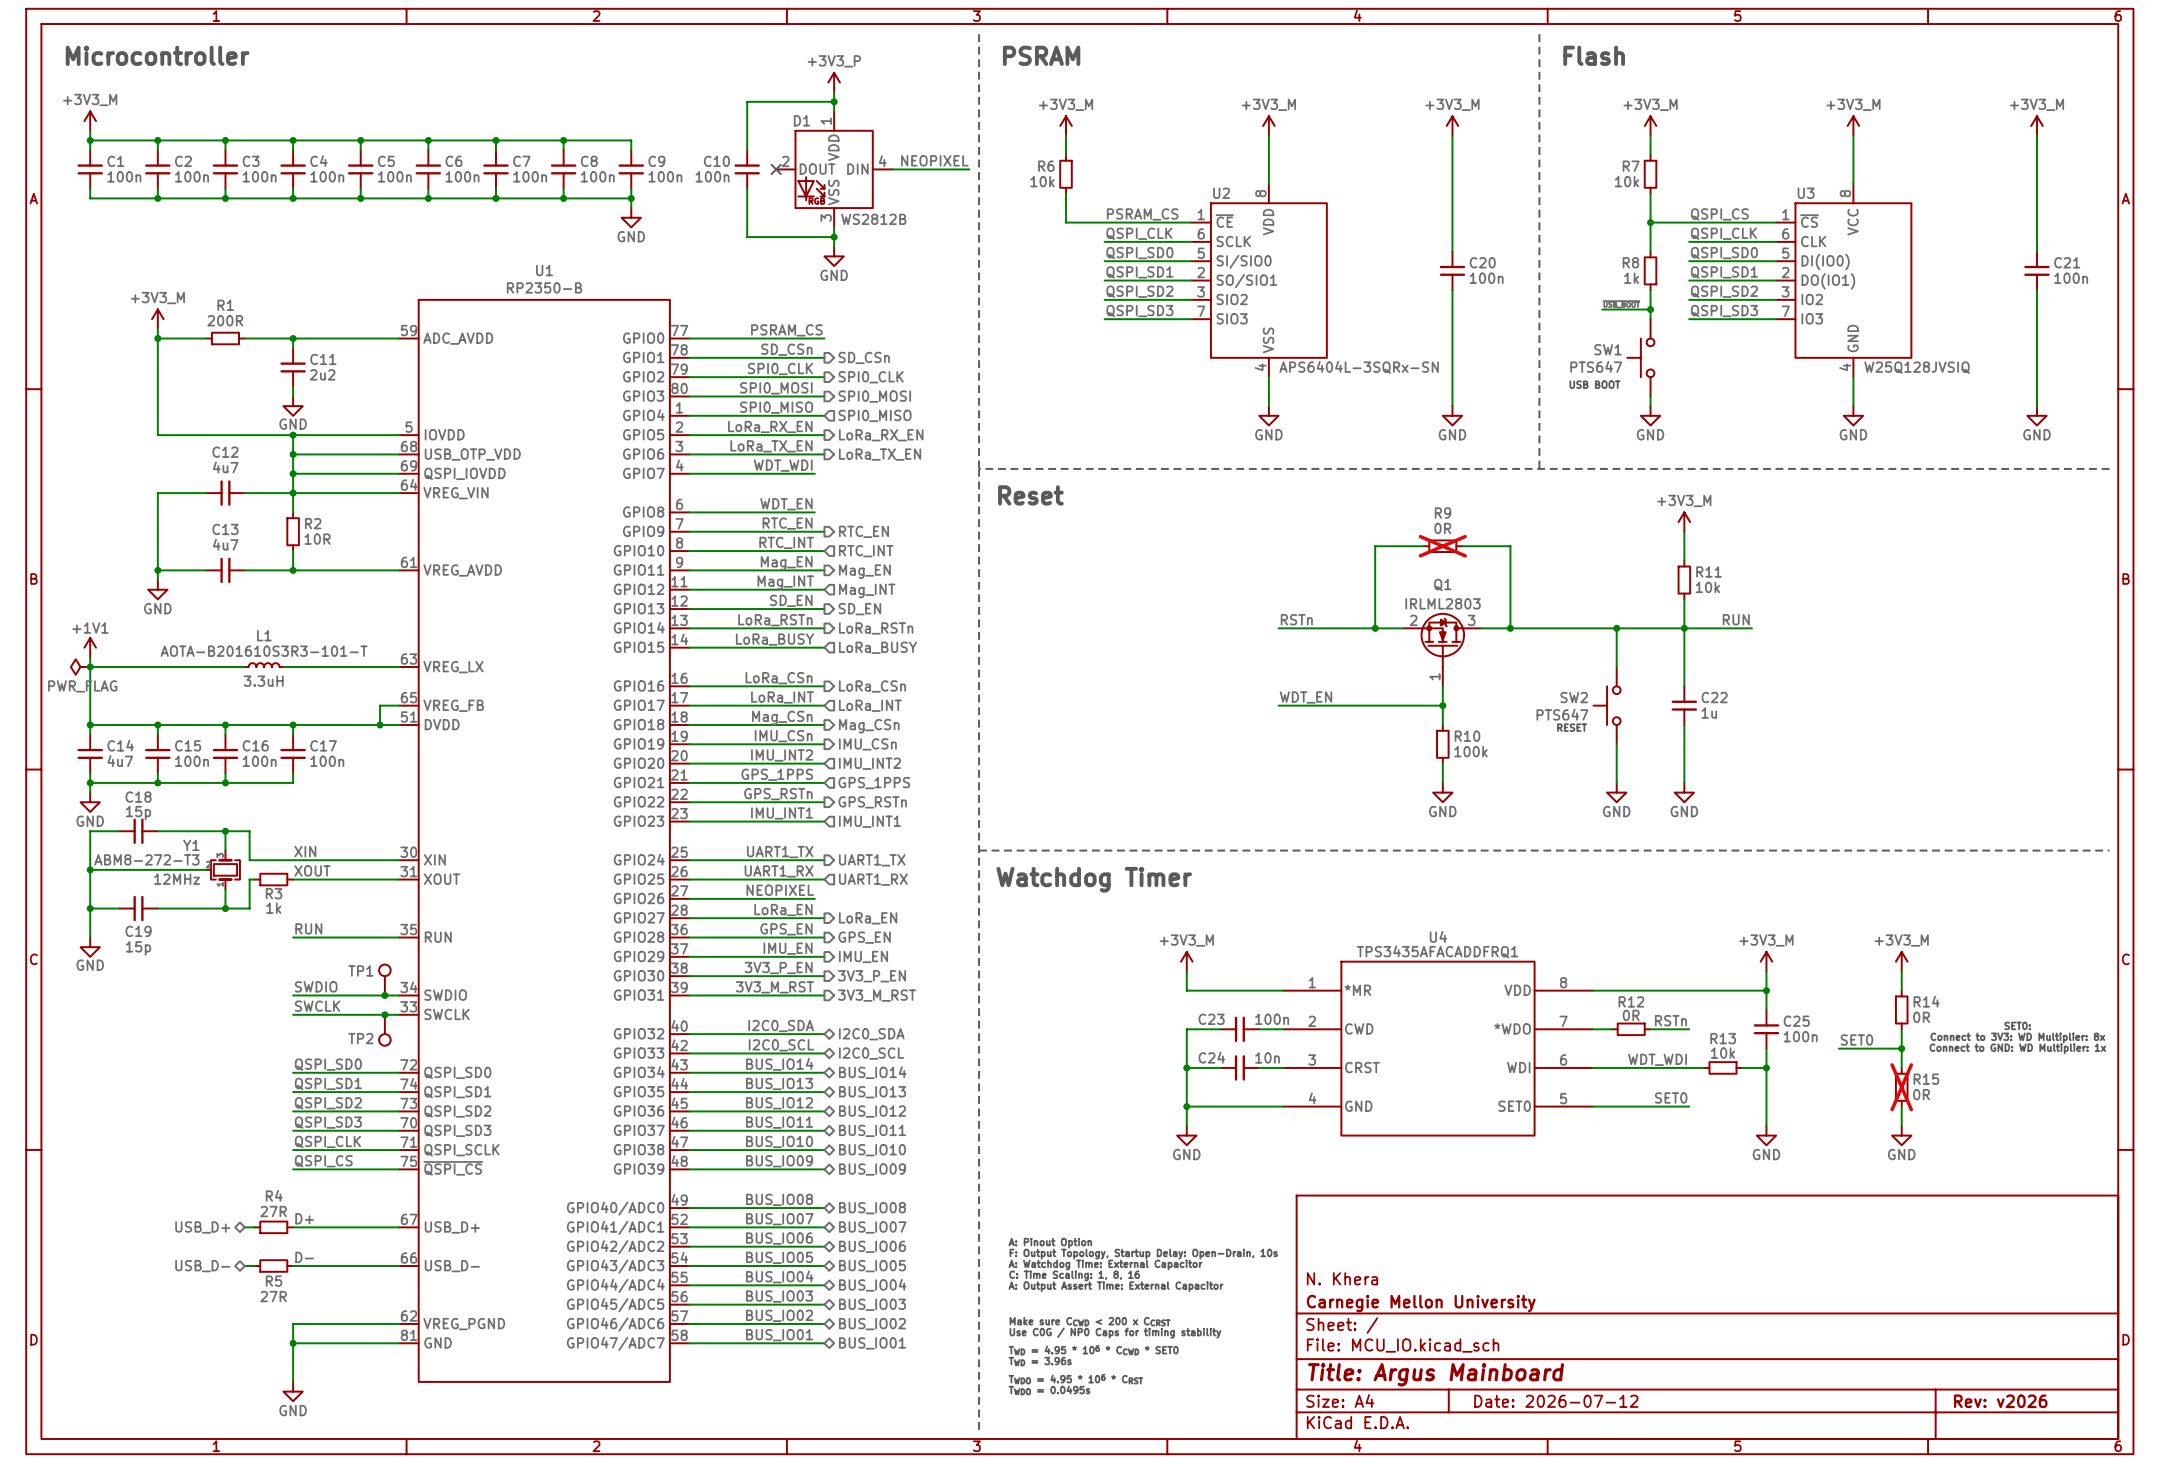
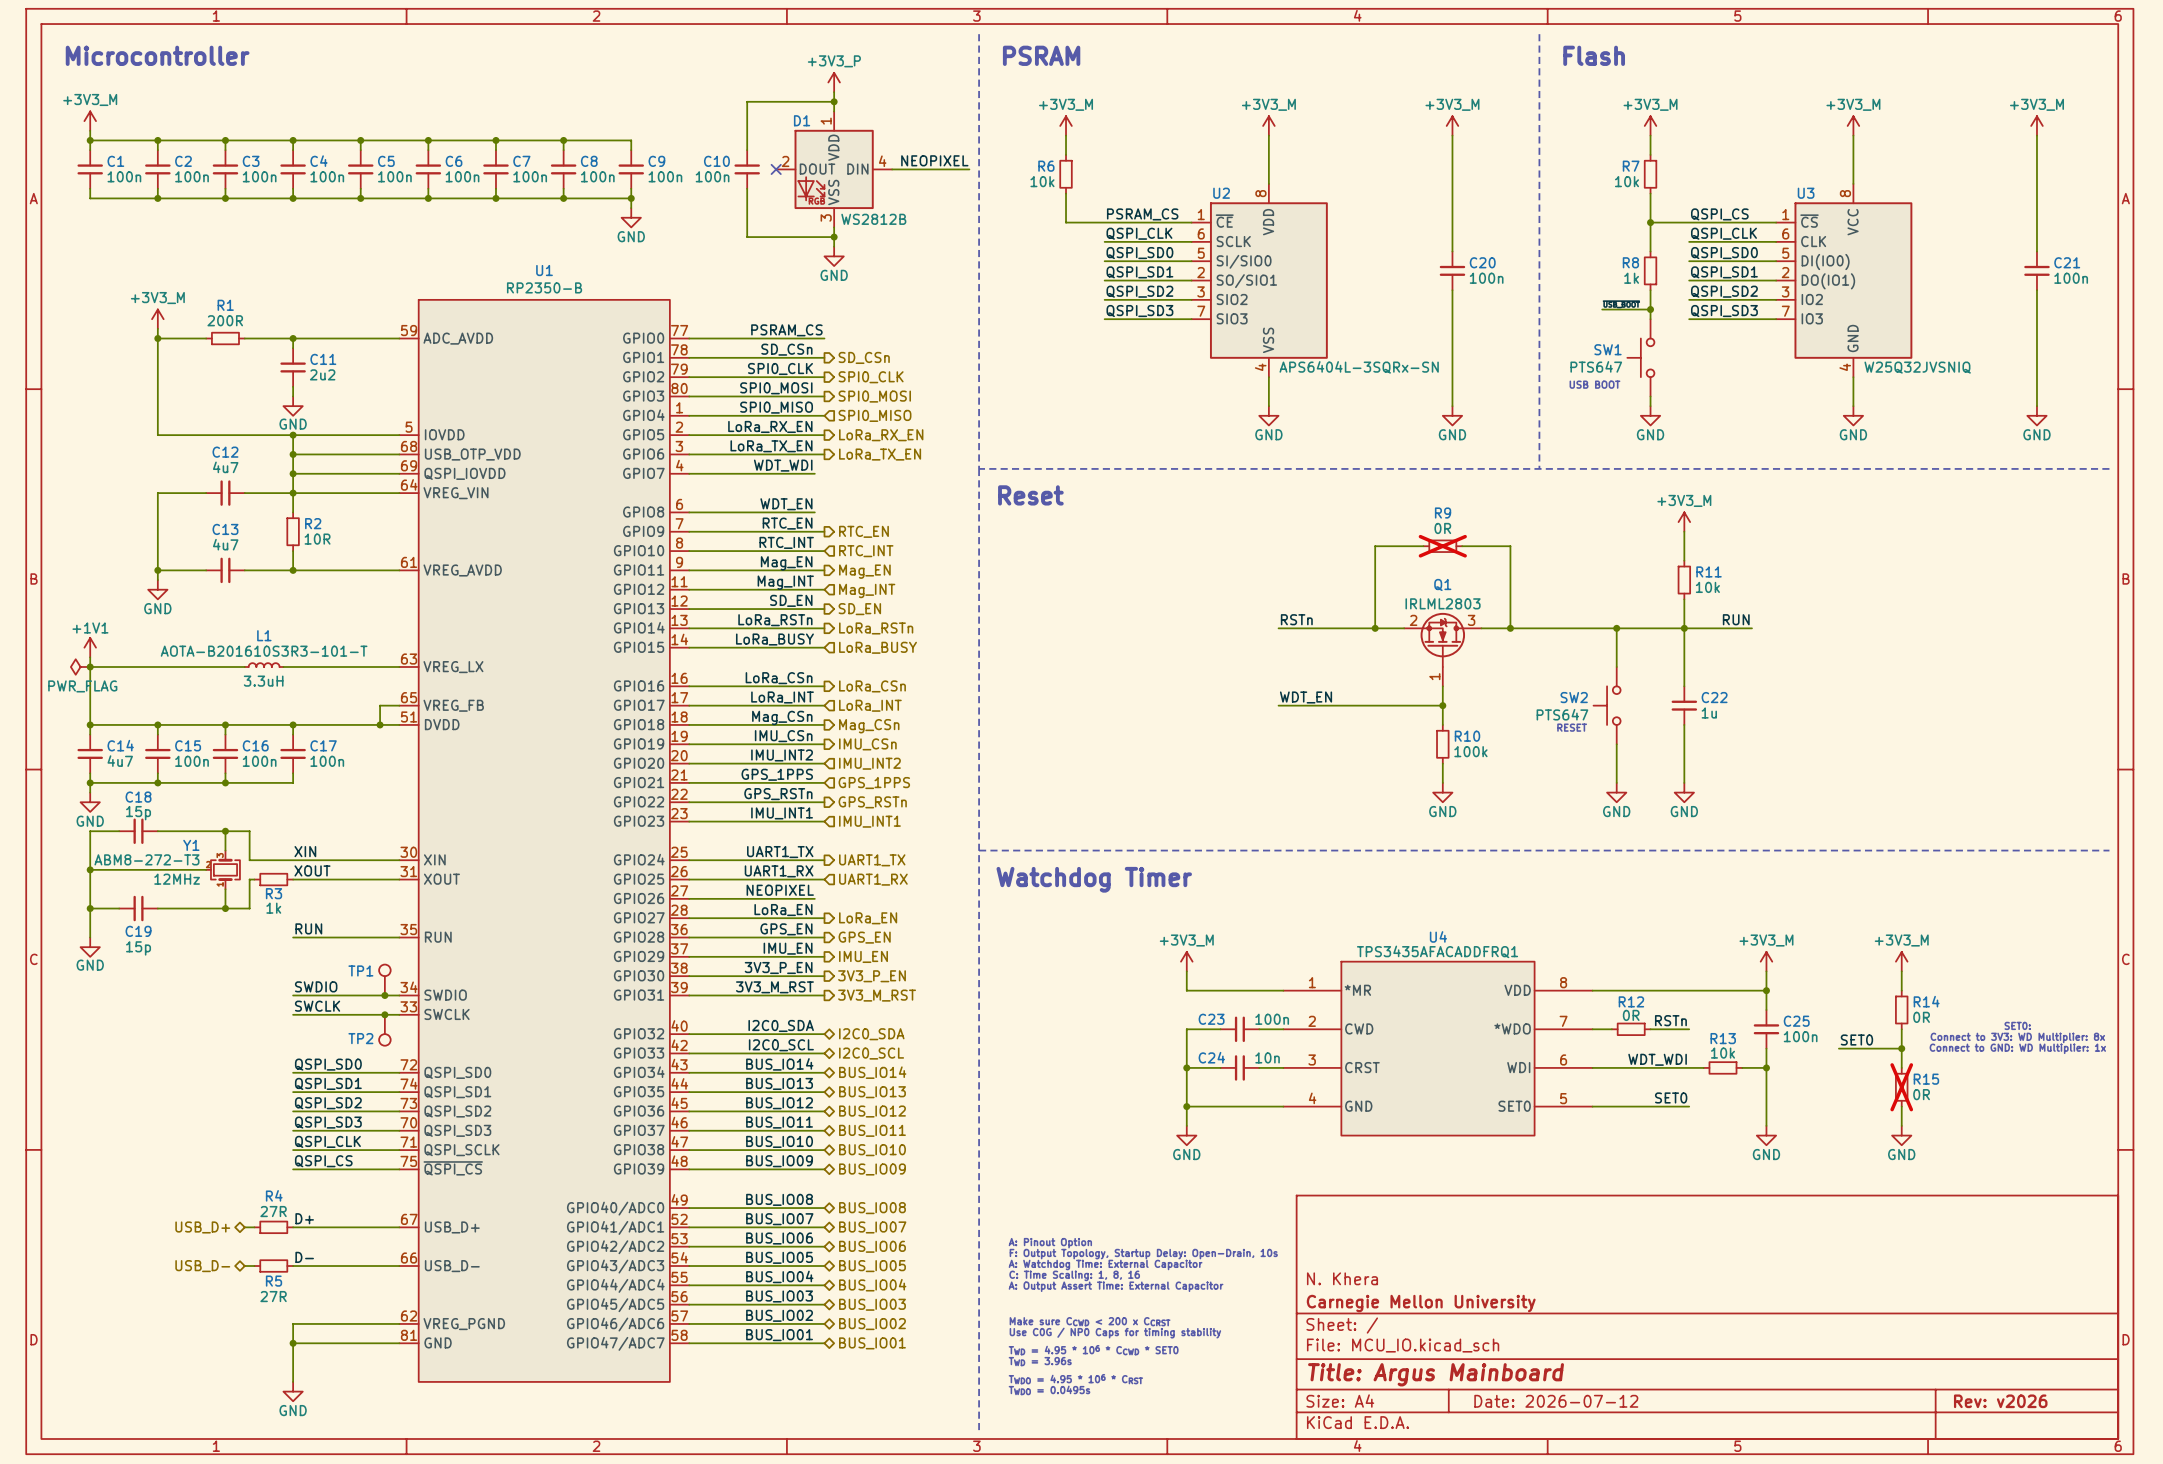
U3 value: W25Q128JVSIQ (1917, 367) -> W25Q32JVSNIQ (1917, 367)

